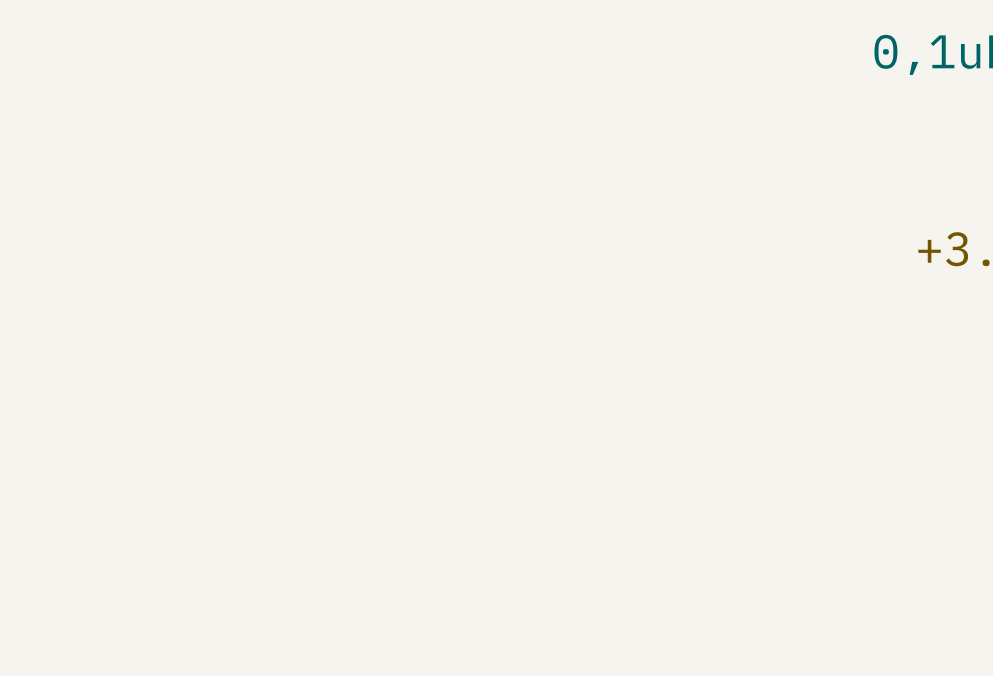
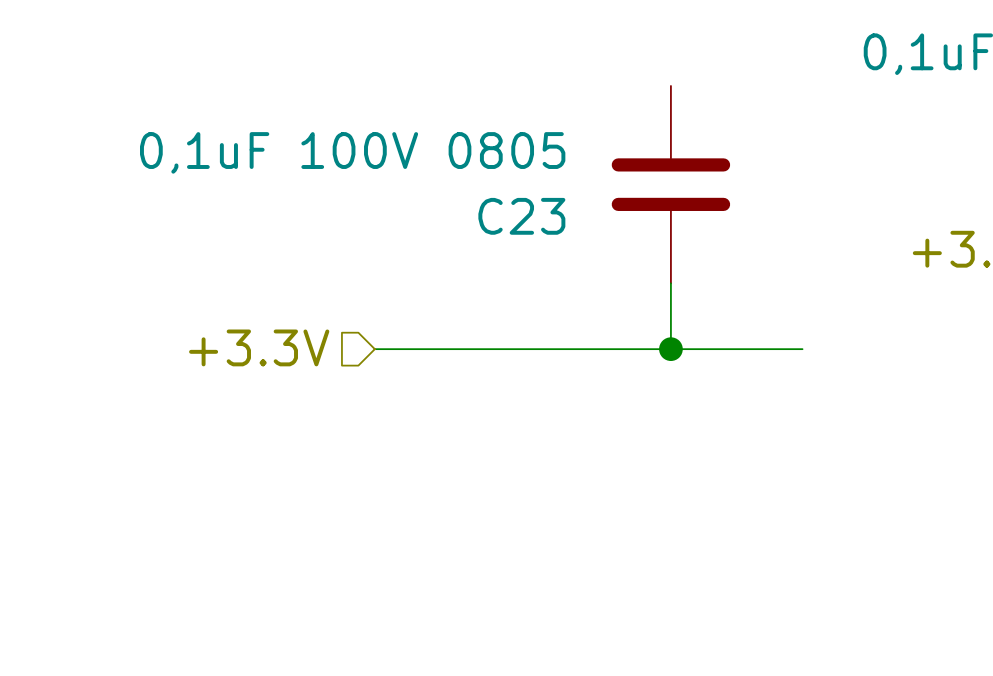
C23: none -> 0,1uF 100V 0805 (670, 184)
wire: none -> (670, 283) (670, 349)
hierarchical label: none -> +3.3V (259, 347)
wire: none -> (374, 349) (802, 349)
junction: none -> (670, 349)

